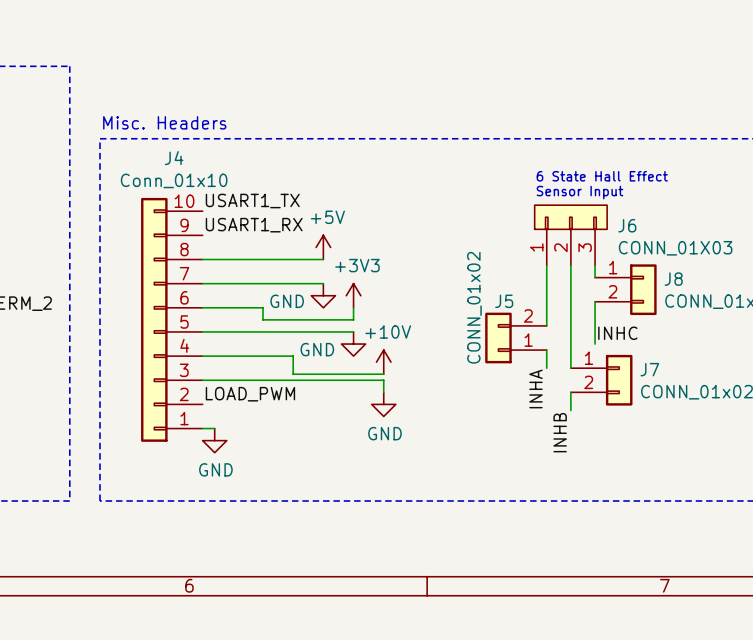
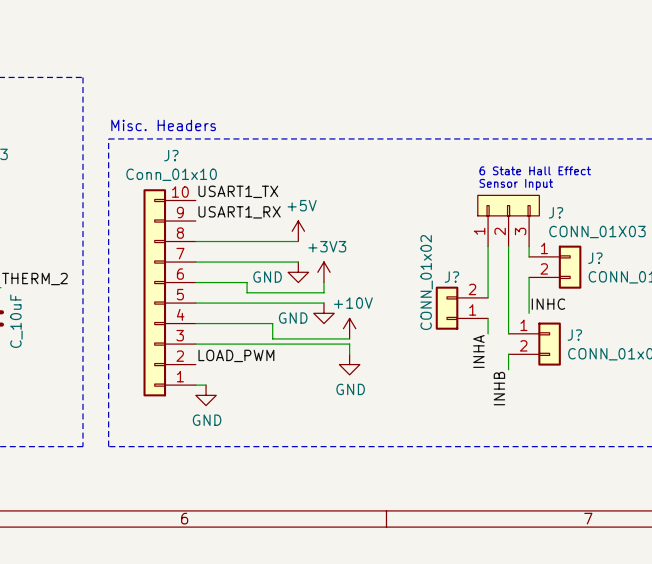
J4 name: J4 (174, 158) -> J? (171, 155)
J6 name: J6 (627, 225) -> J? (555, 212)
J8 name: J8 (673, 279) -> J? (595, 258)
J5 name: J5 (504, 301) -> J? (451, 277)
J7 name: J7 (649, 369) -> J? (574, 335)

